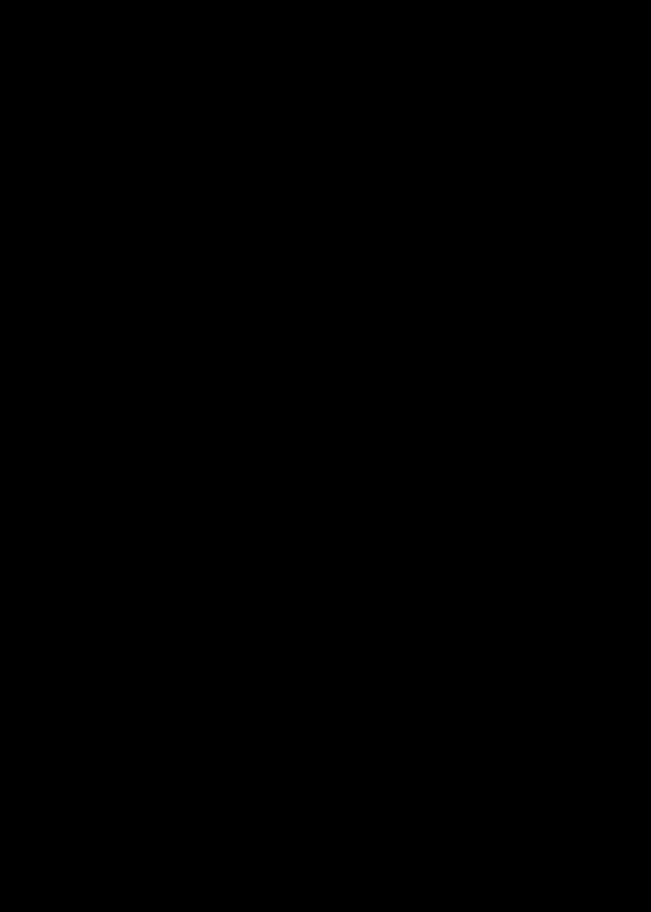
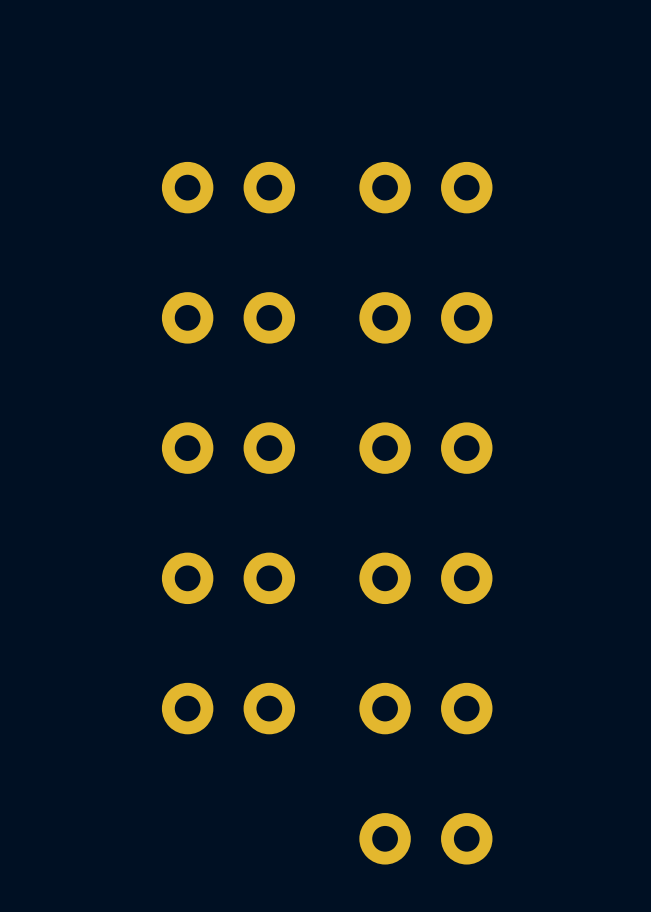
part: none -> (228, 187)
part: none -> (425, 187)
part: none -> (228, 317)
part: none -> (425, 317)
part: none -> (228, 448)
part: none -> (425, 448)
part: none -> (228, 578)
part: none -> (425, 578)
part: none -> (228, 708)
part: none -> (425, 708)
part: none -> (425, 838)

